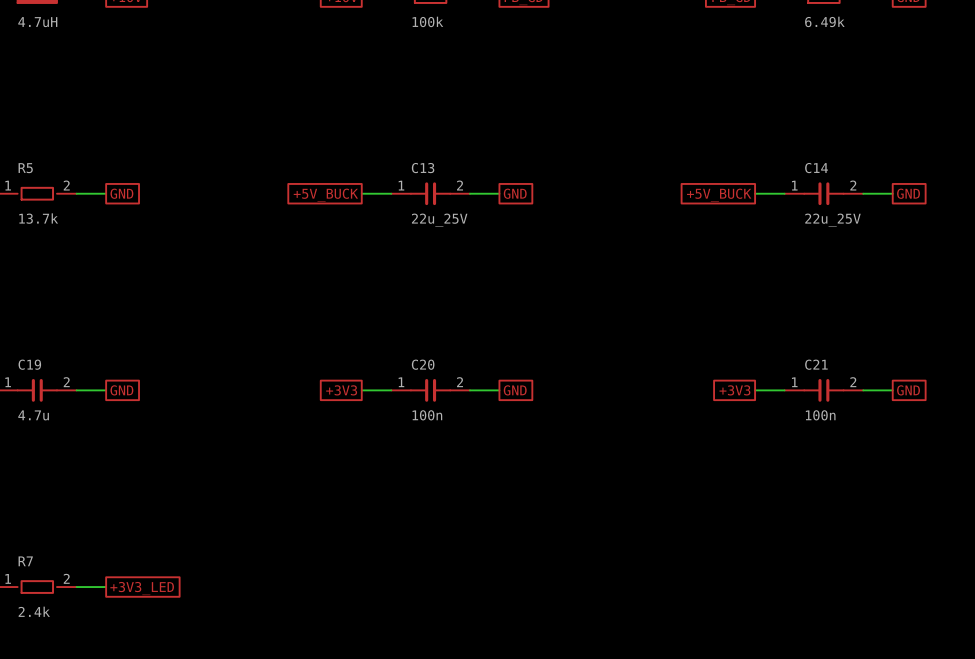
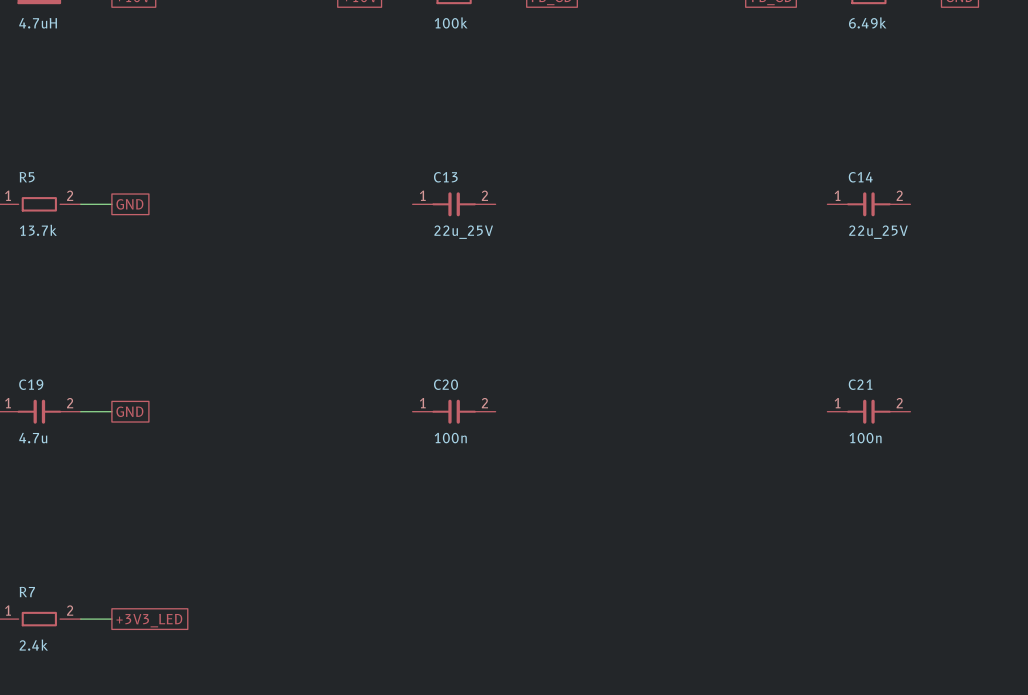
wire: (361, 193) (391, 193) -> none
wire: (469, 193) (499, 193) -> none
global label: GND (515, 193) -> none
wire: (755, 193) (784, 193) -> none
wire: (863, 193) (892, 193) -> none
global label: GND (908, 193) -> none
global label: +5V_BUCK (325, 195) -> none
global label: +5V_BUCK (719, 195) -> none
global label: +3V3 (341, 390) -> none
wire: (361, 390) (391, 390) -> none
wire: (469, 390) (499, 390) -> none
global label: GND (515, 390) -> none
global label: +3V3 (734, 390) -> none
wire: (755, 390) (784, 390) -> none
wire: (863, 390) (892, 390) -> none
global label: GND (908, 390) -> none

